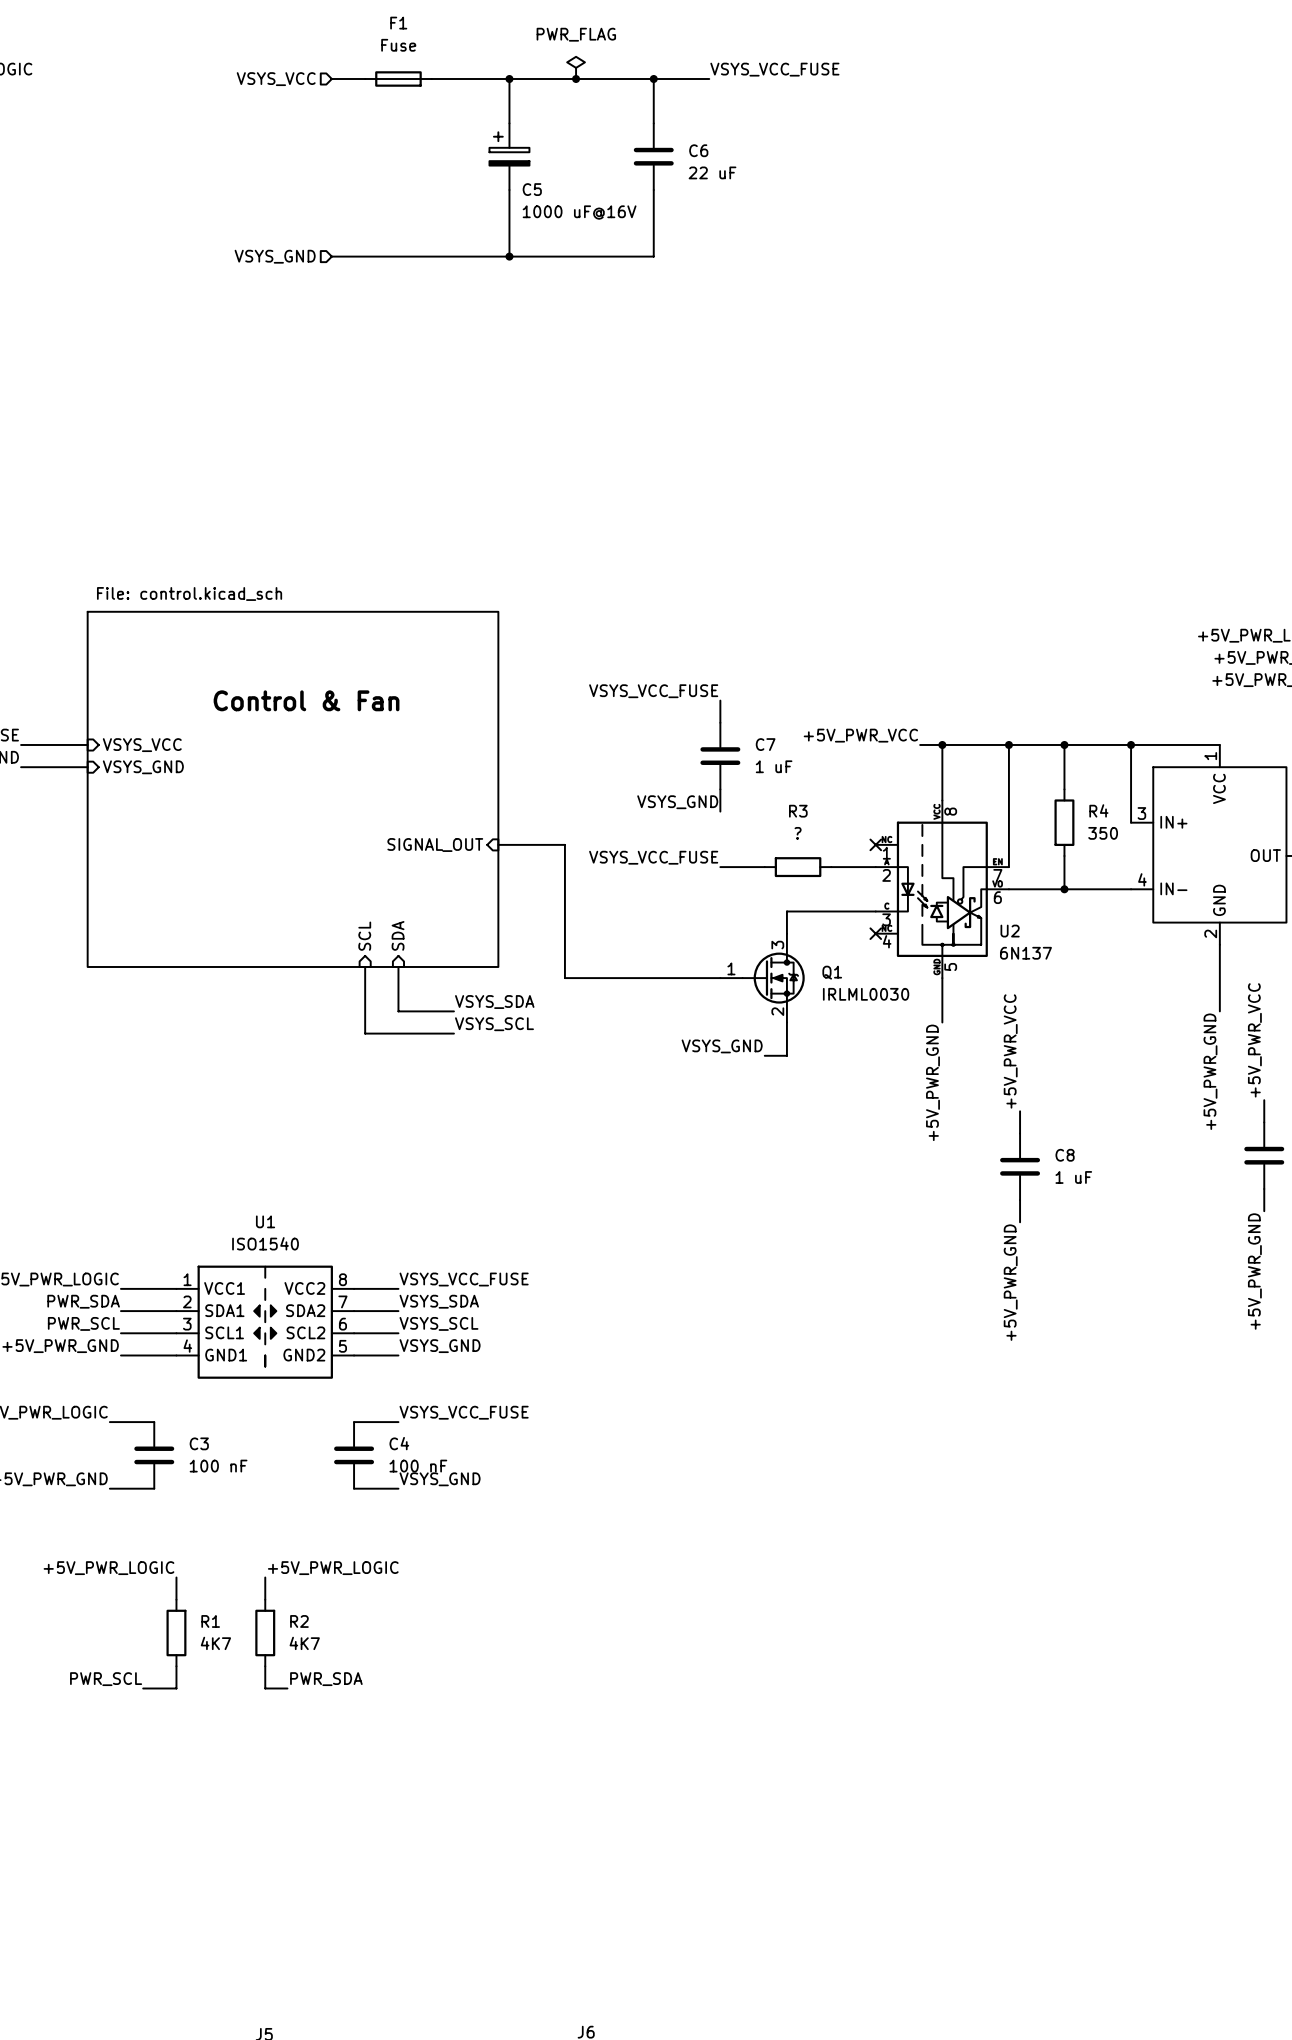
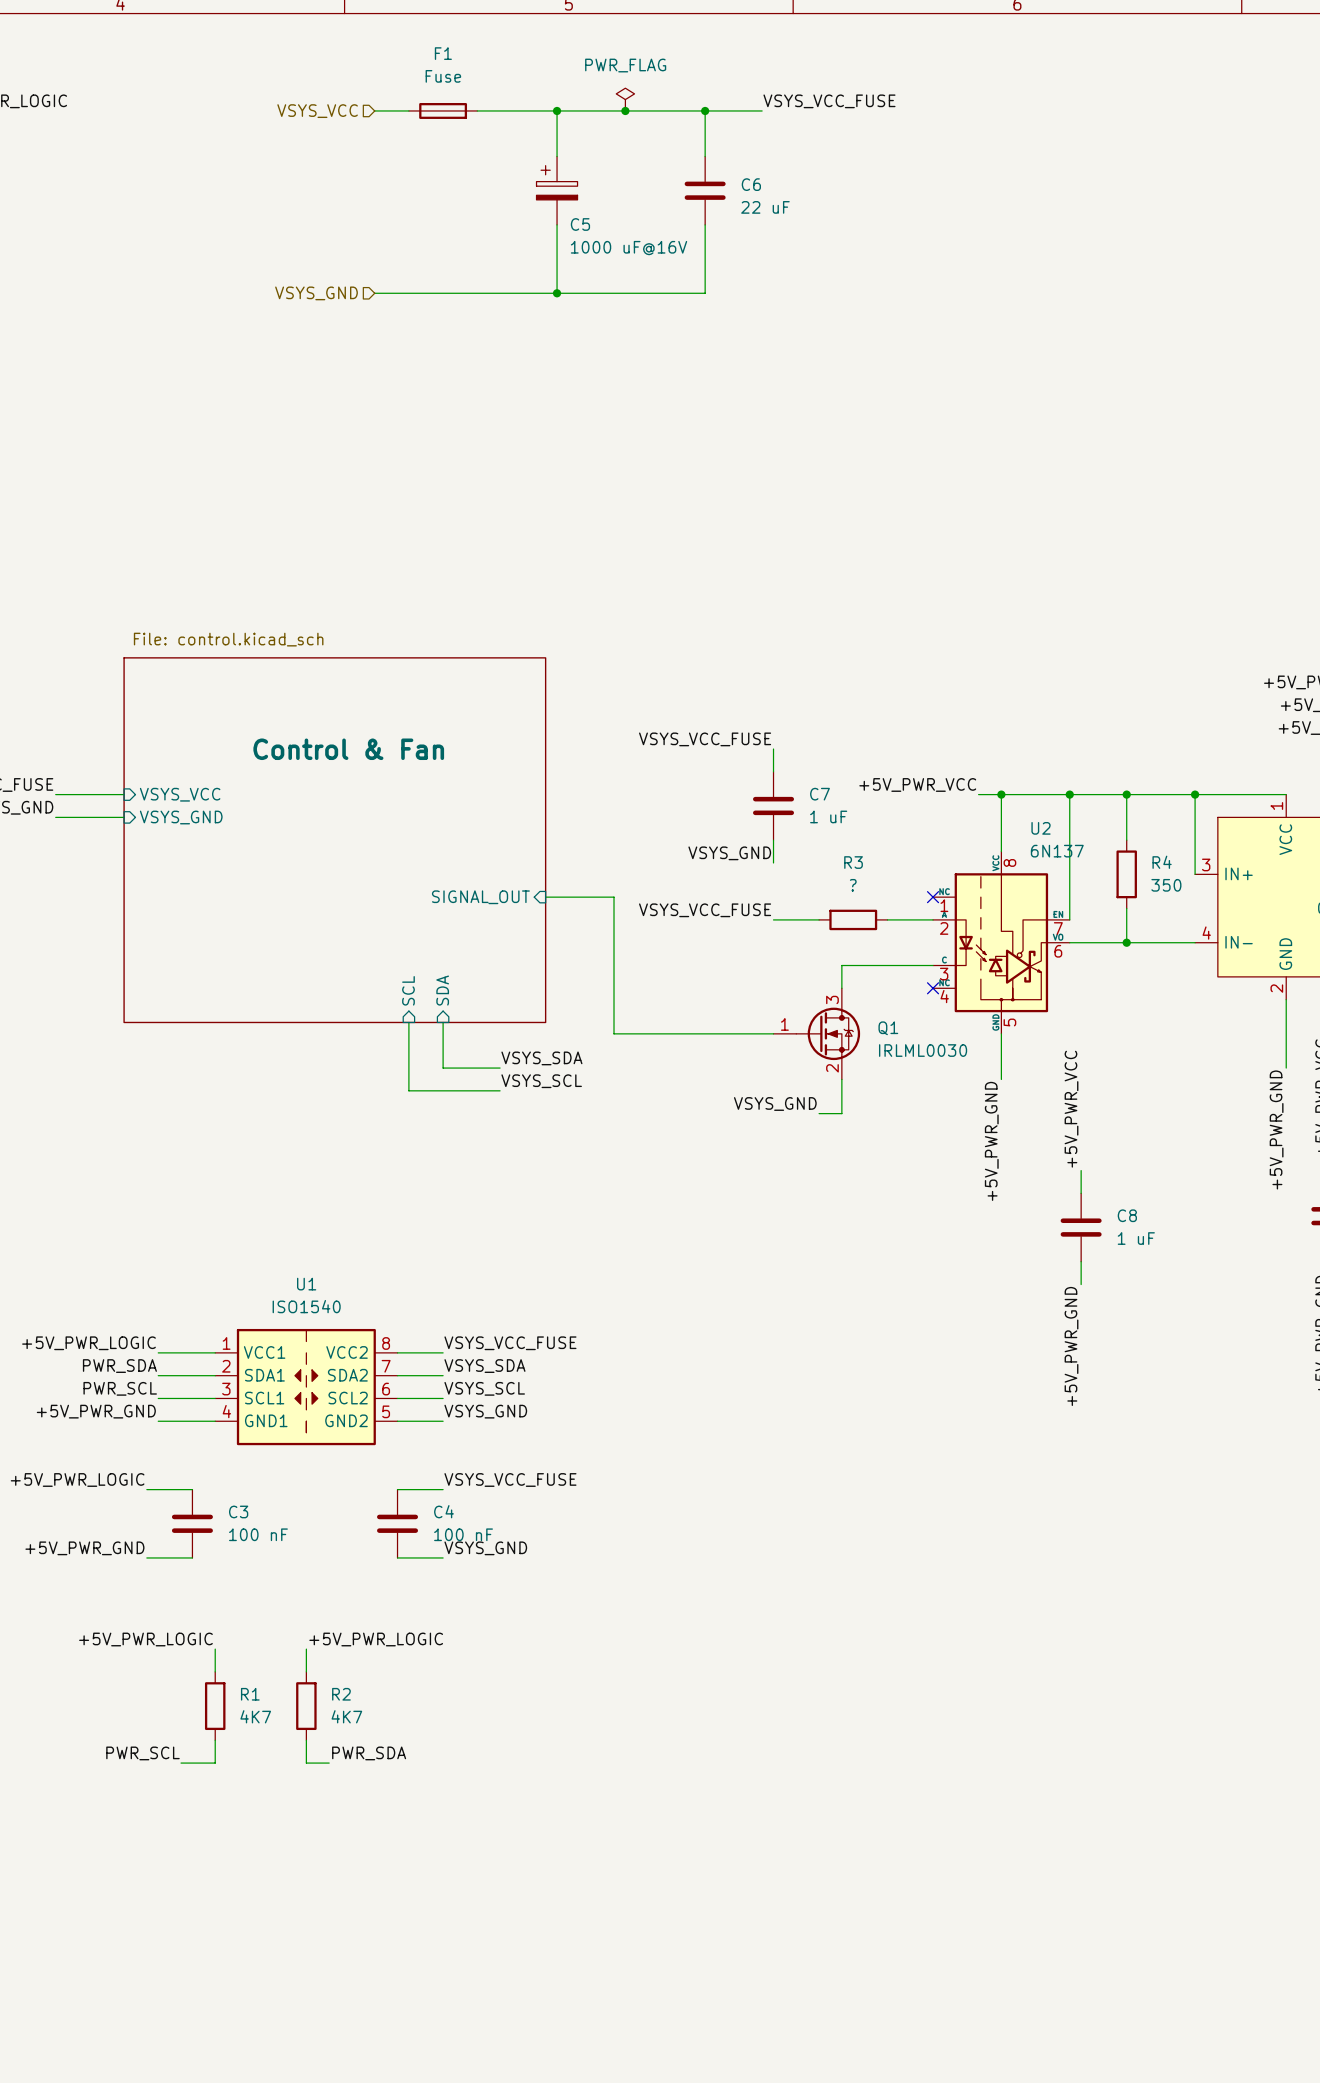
U2 name position: U2 (1010, 931) -> U2 (1041, 828)
U2 value position: 6N137 (1025, 953) -> 6N137 (1057, 851)

